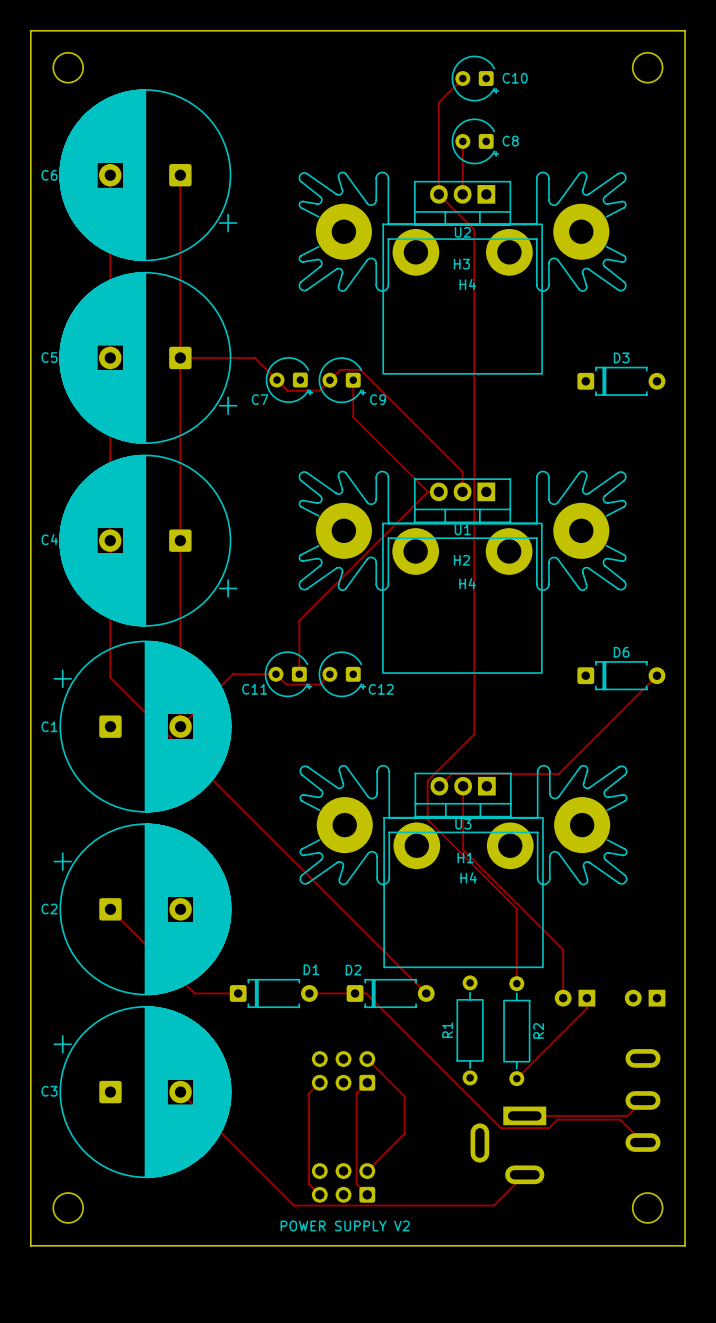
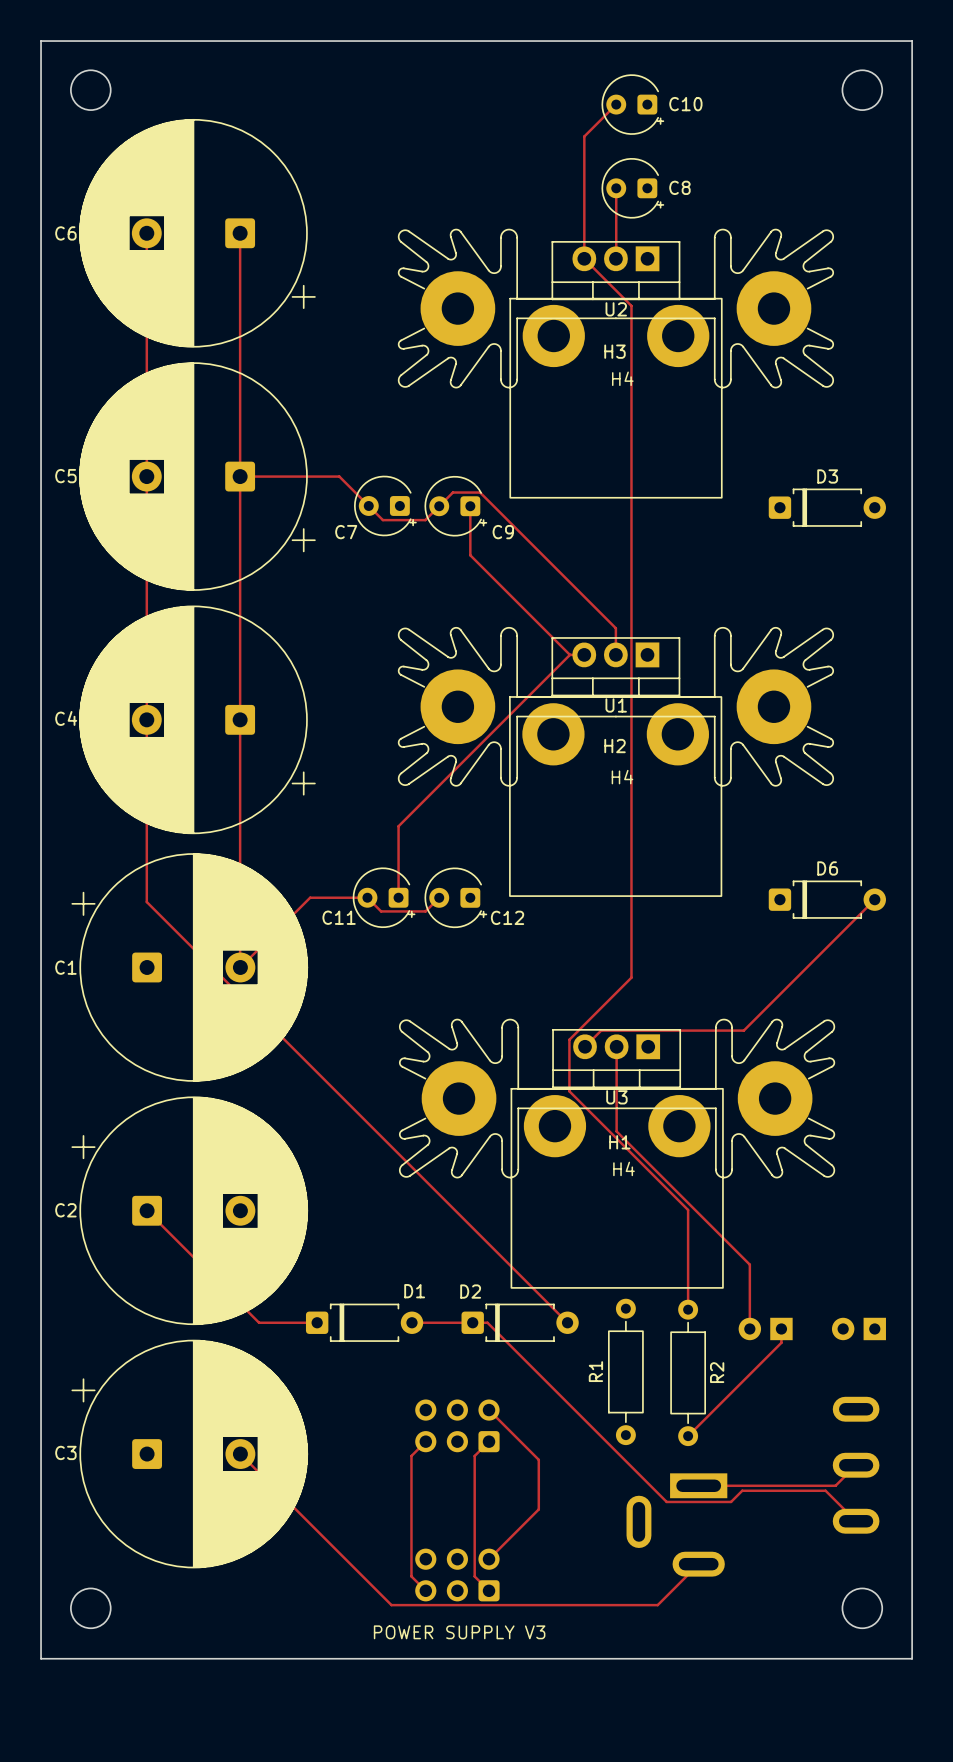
text: POWER SUPPLY V2 (345, 1225) -> POWER SUPPLY V3 (459, 1632)

